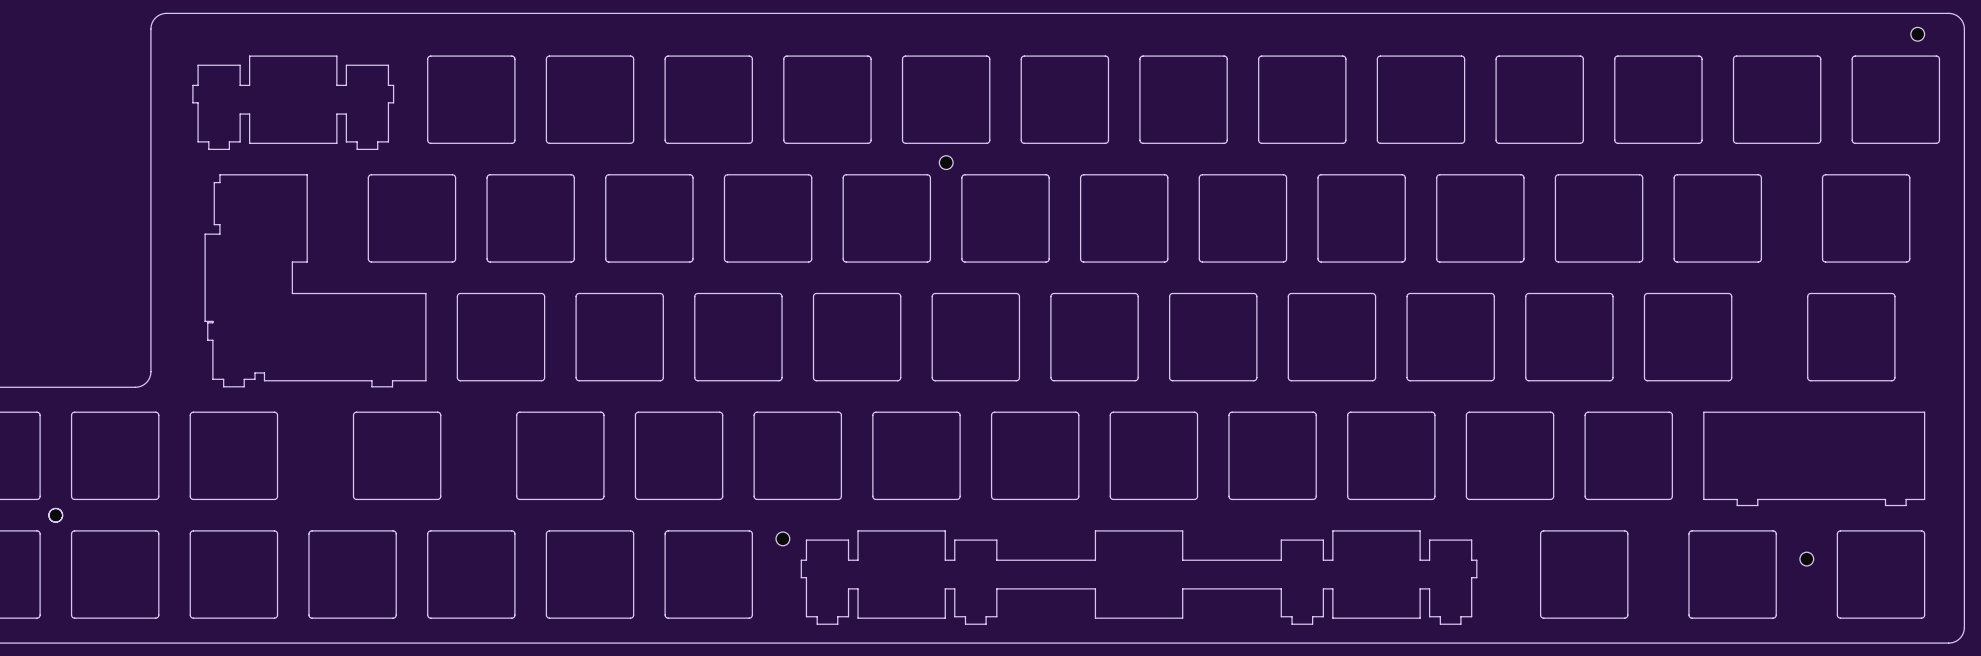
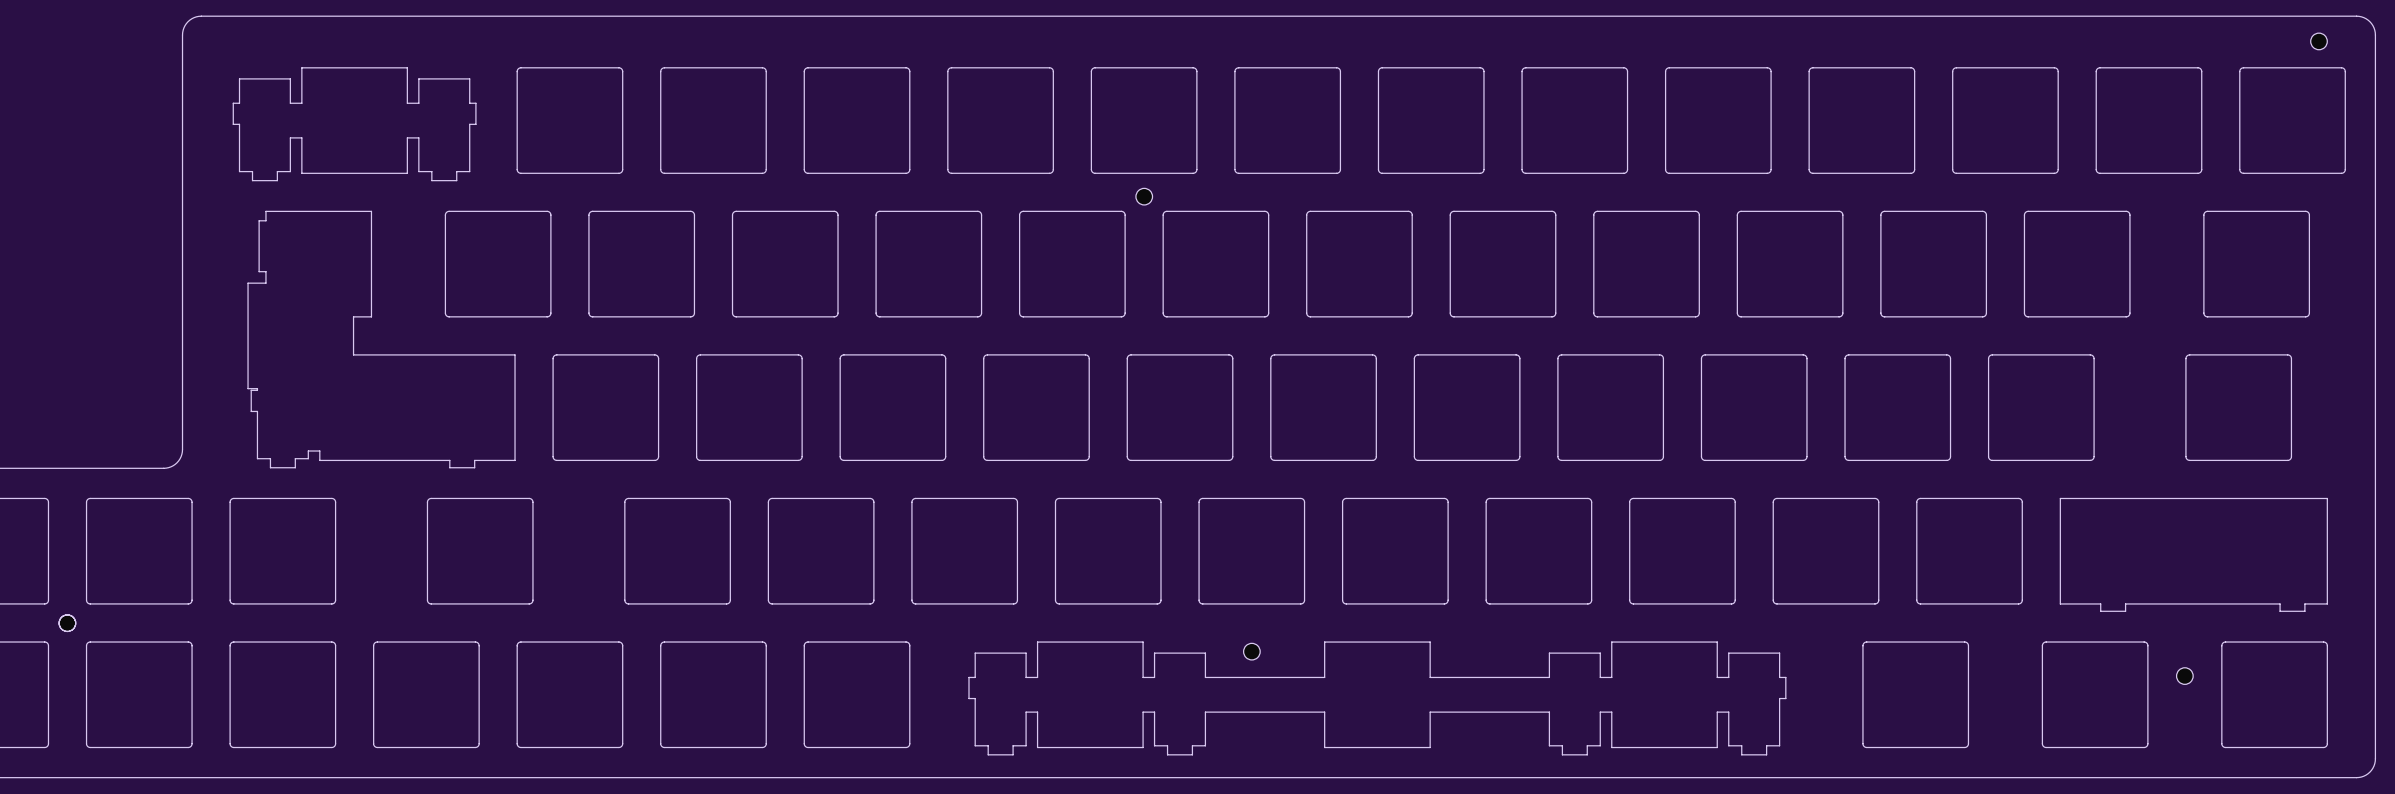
part: (782, 538) -> none
part: none -> (1251, 651)

